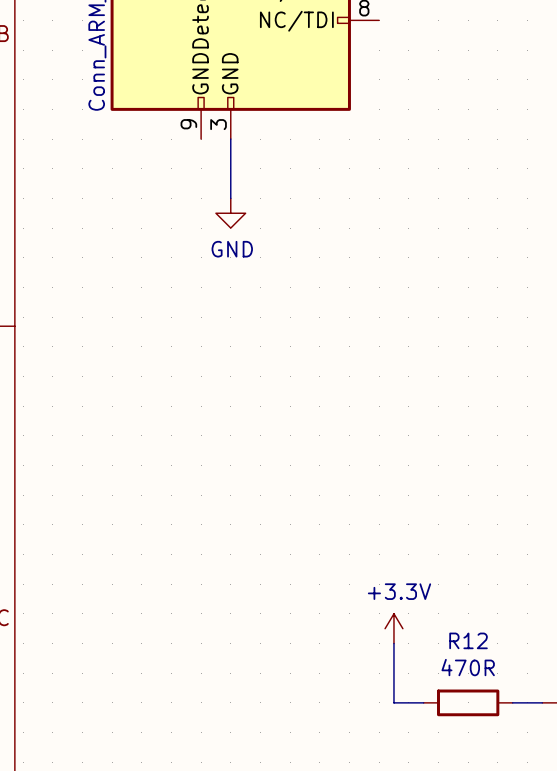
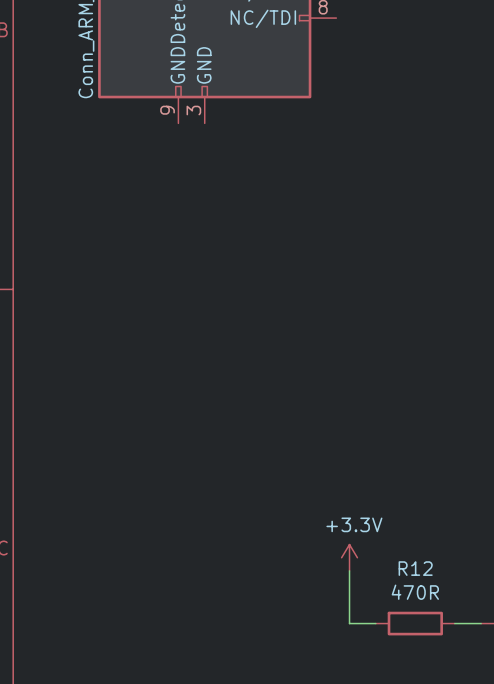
wire: (230, 139) (230, 198) -> none
power symbol: GND (230, 213) -> none

